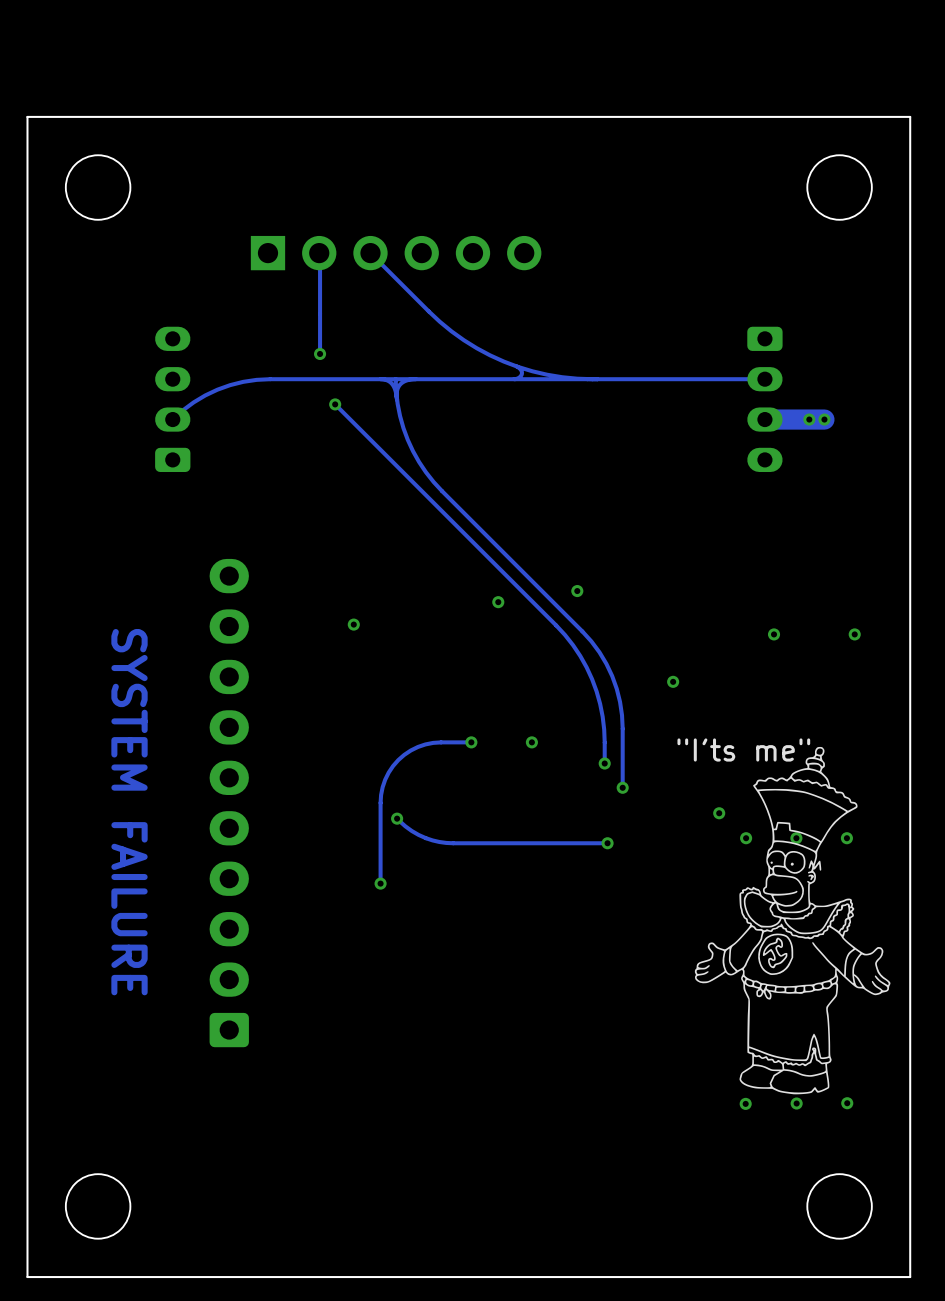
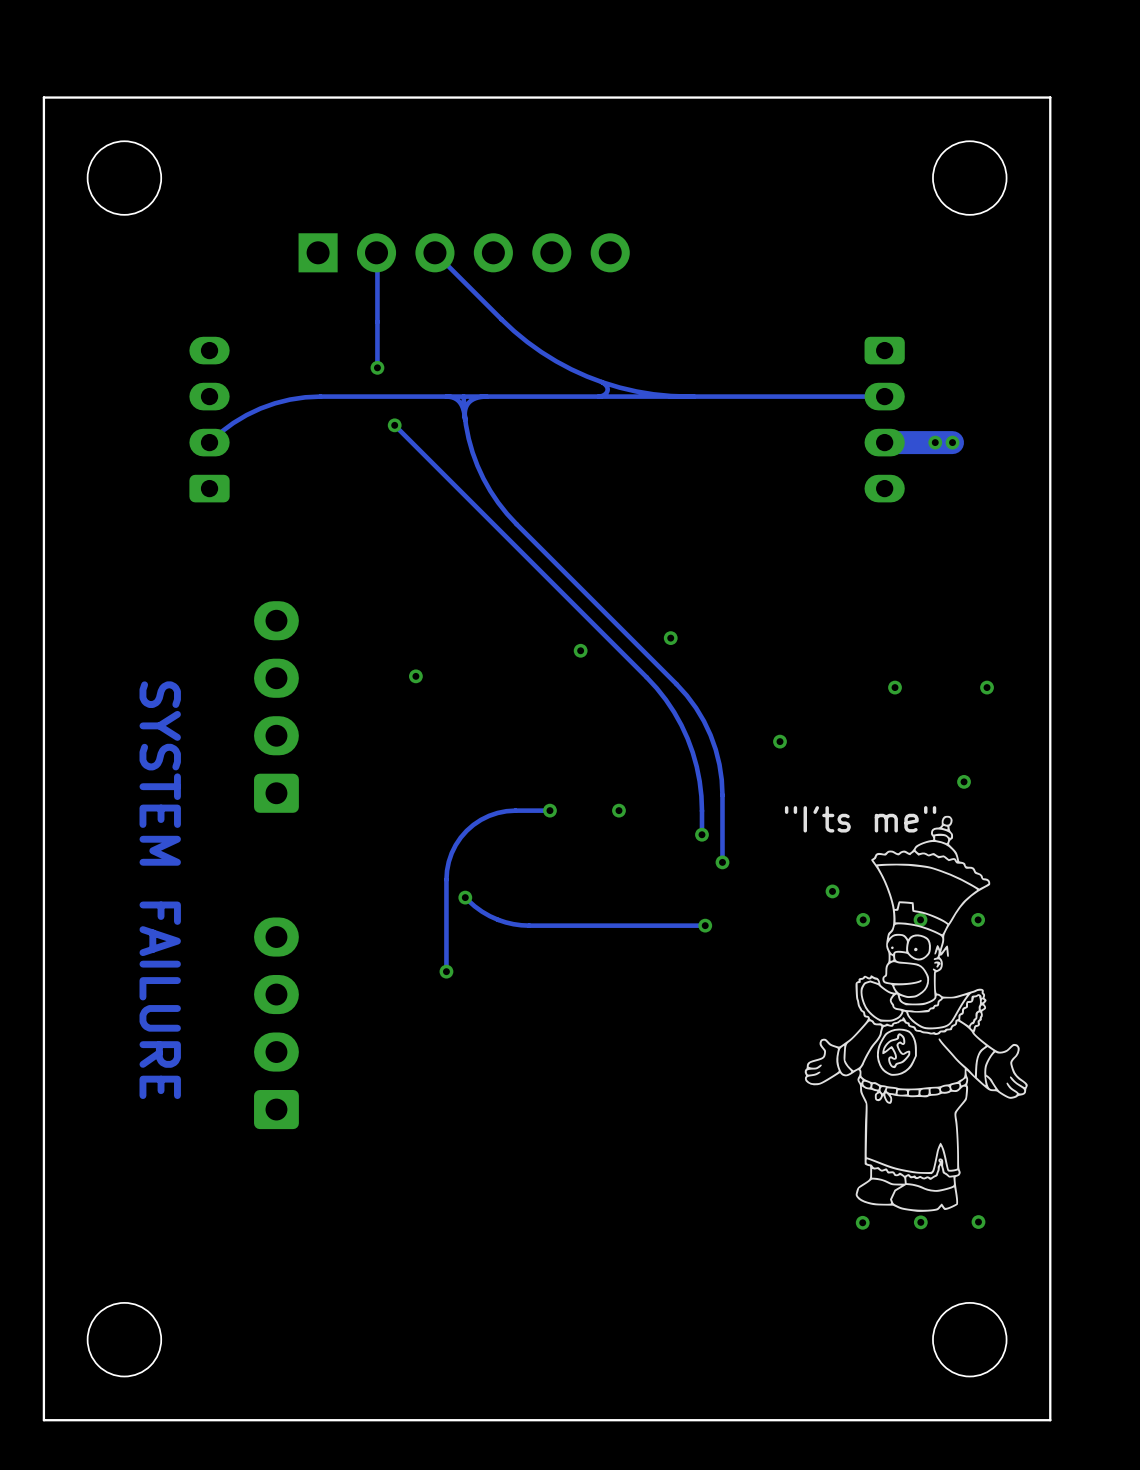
part: none -> (276, 707)
via: none -> (964, 781)
part: (229, 803) -> none
part: none -> (276, 1023)

